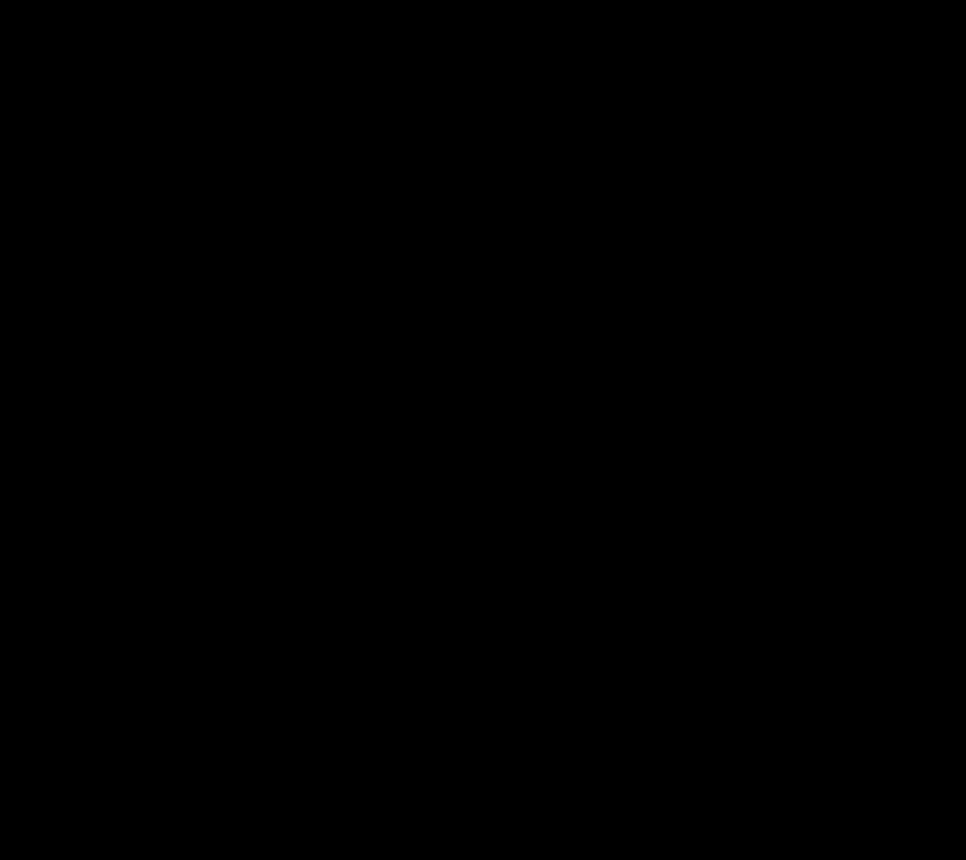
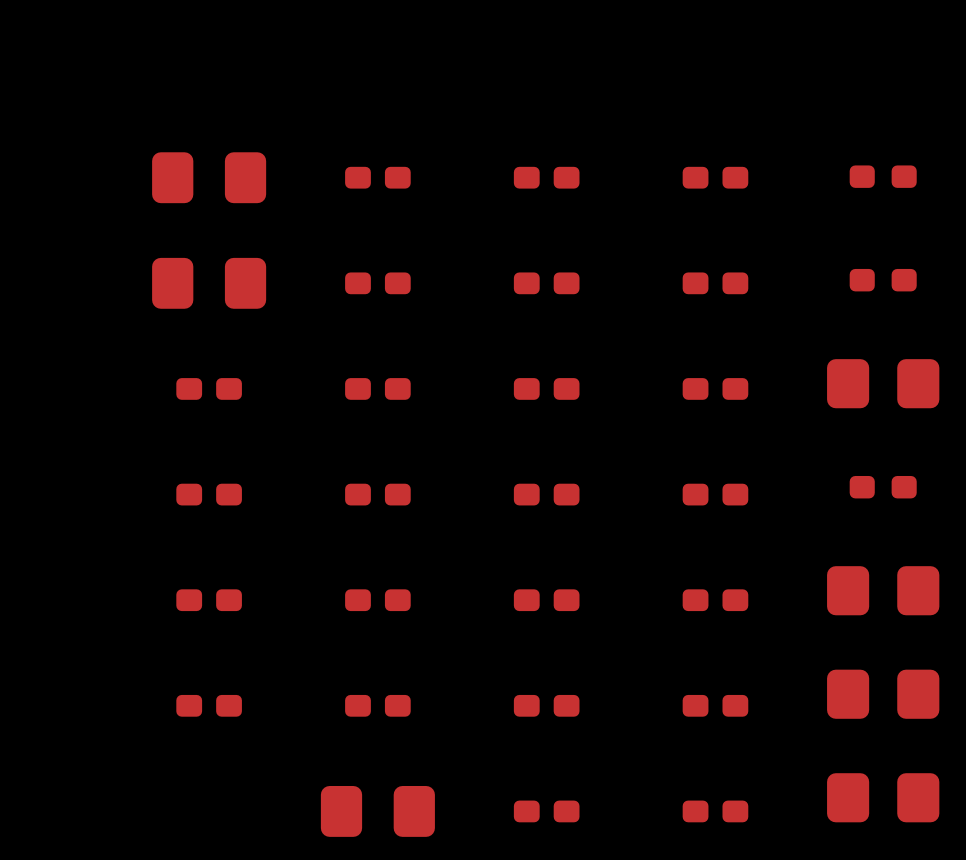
part: none -> (883, 176)
part: none -> (209, 177)
part: none -> (377, 177)
part: none -> (546, 177)
part: none -> (715, 177)
part: none -> (883, 280)
part: none -> (209, 283)
part: none -> (377, 283)
part: none -> (546, 283)
part: none -> (715, 283)
part: none -> (883, 383)
part: none -> (209, 388)
part: none -> (377, 388)
part: none -> (546, 388)
part: none -> (715, 388)
part: none -> (883, 487)
part: none -> (209, 494)
part: none -> (377, 494)
part: none -> (546, 494)
part: none -> (715, 494)
part: none -> (883, 590)
part: none -> (209, 600)
part: none -> (377, 600)
part: none -> (546, 600)
part: none -> (715, 600)
part: none -> (883, 694)
part: none -> (209, 705)
part: none -> (377, 705)
part: none -> (546, 705)
part: none -> (715, 705)
part: none -> (883, 797)
part: none -> (377, 811)
part: none -> (546, 811)
part: none -> (715, 811)

